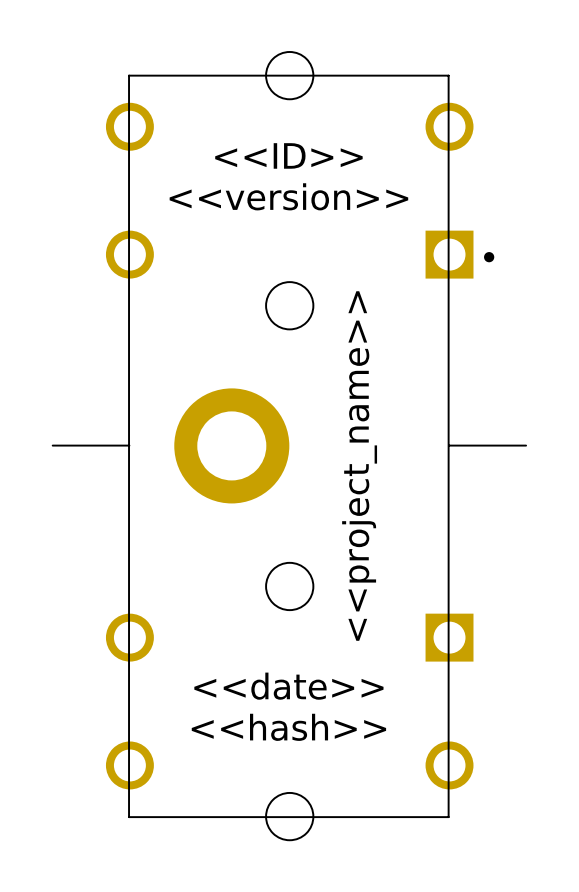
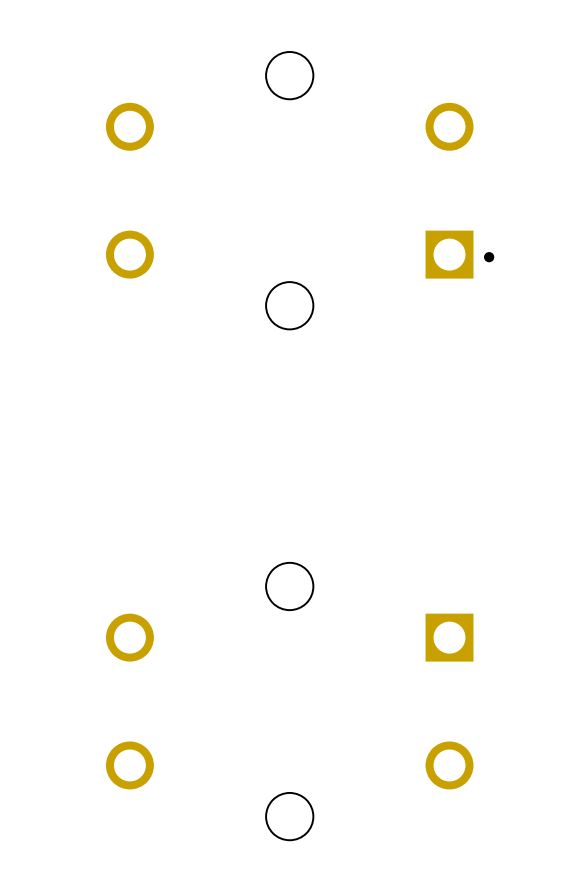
board edge: (448, 75) (129, 75) (129, 817) (448, 817) (448, 75) -> none
text: <<ID>> (288, 155) -> none
text: <<version>> (288, 196) -> none
board edge: (129, 445) (52, 445) -> none
part: (231, 445) -> none
board edge: (526, 445) (449, 445) -> none
text: <<project_name>> (359, 466) -> none
text: <<date>> (288, 686) -> none
text: <<hash>> (288, 727) -> none

